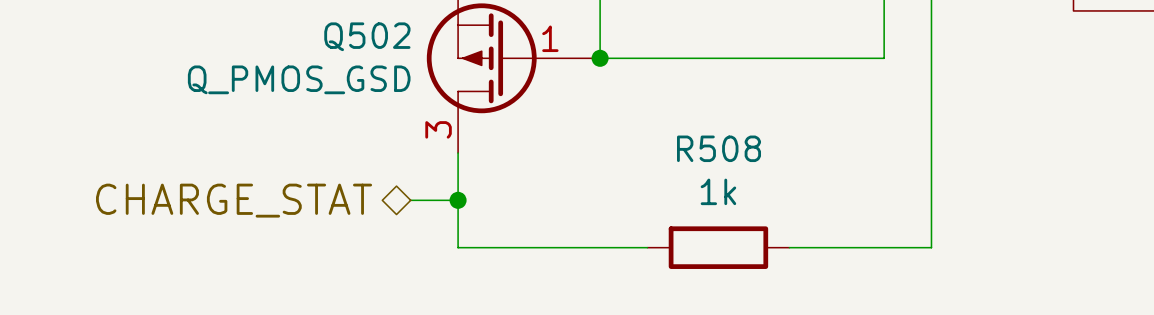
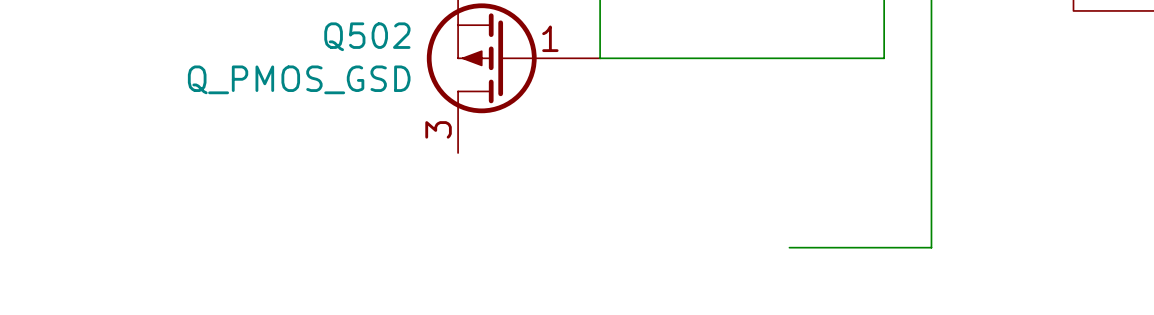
junction: (600, 58) -> none
wire: (458, 152) (458, 247) (647, 247) -> none
hierarchical label: CHARGE_STAT (234, 200) -> none
wire: (410, 200) (458, 200) -> none
junction: (458, 200) -> none
R508: 1k (718, 247) -> none

